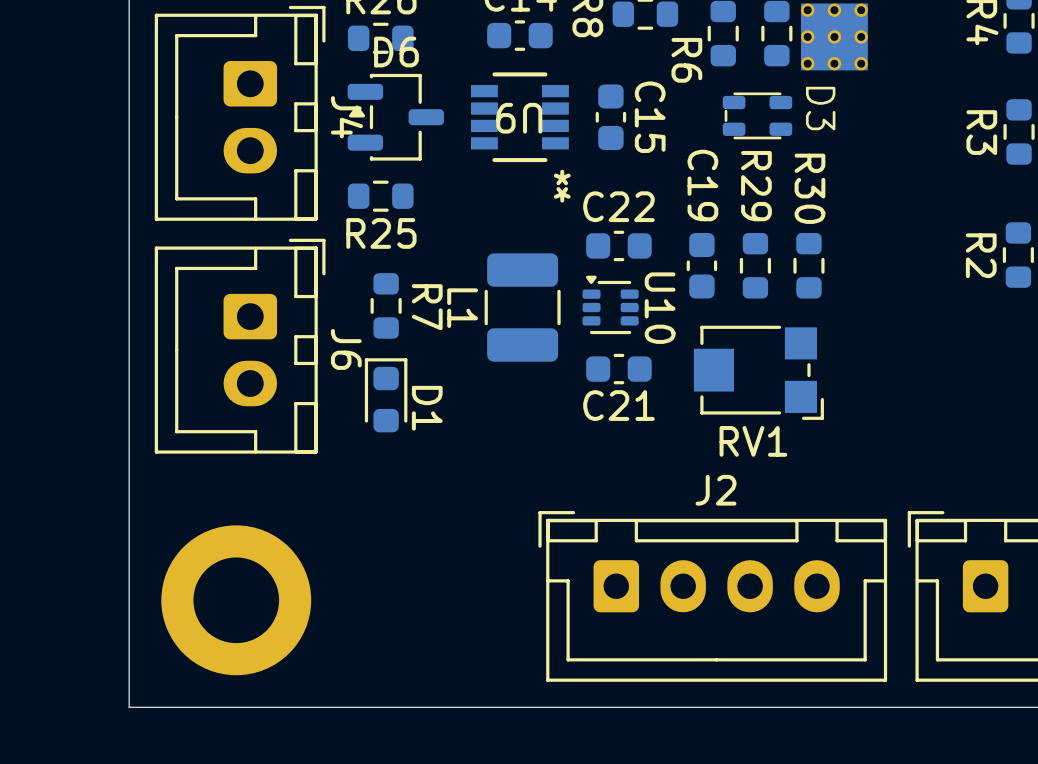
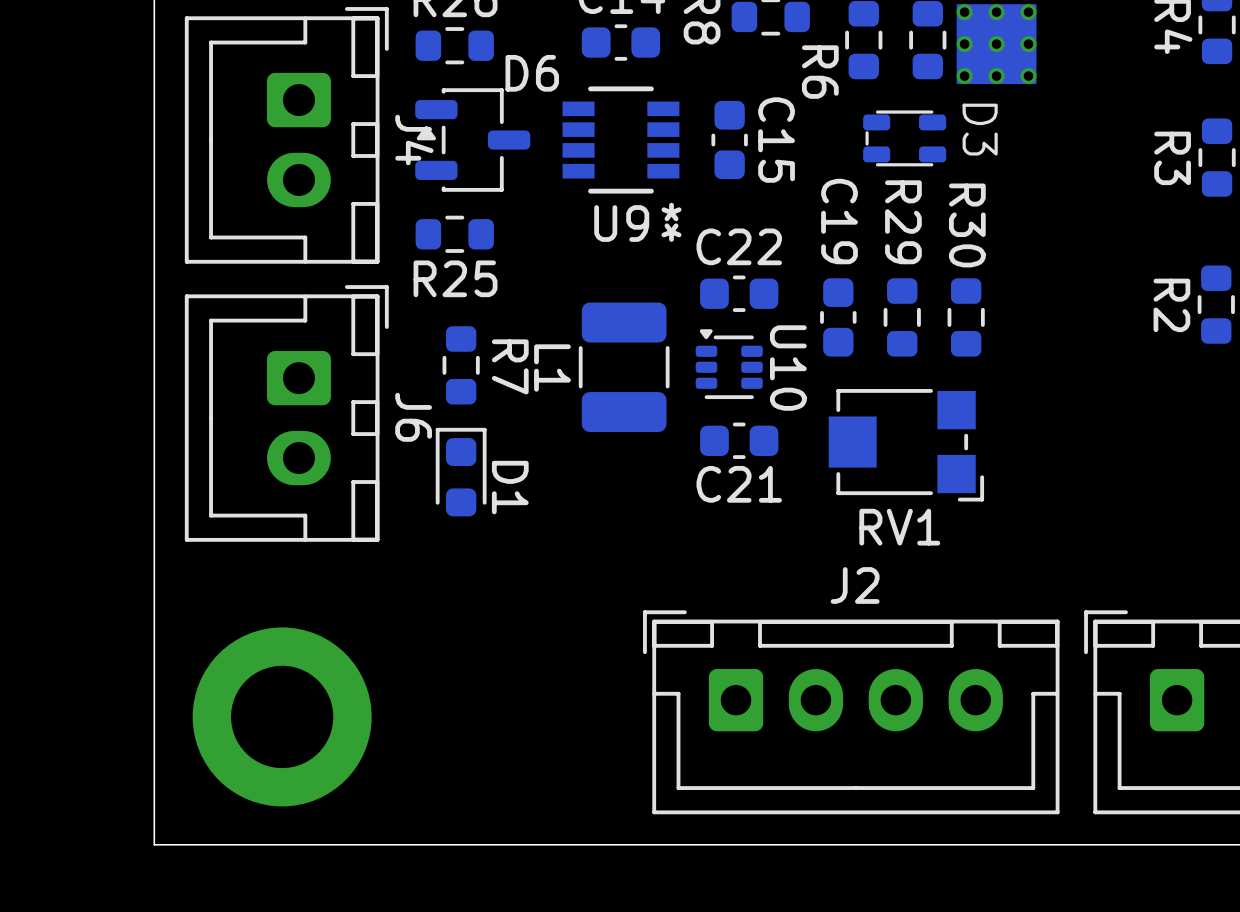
D6 name position: D6 (396, 52) -> D6 (532, 73)
U9 name rotation: 0° (519, 118) -> 180° (621, 223)
U9 name position: U9 (519, 118) -> U9 (621, 223)

